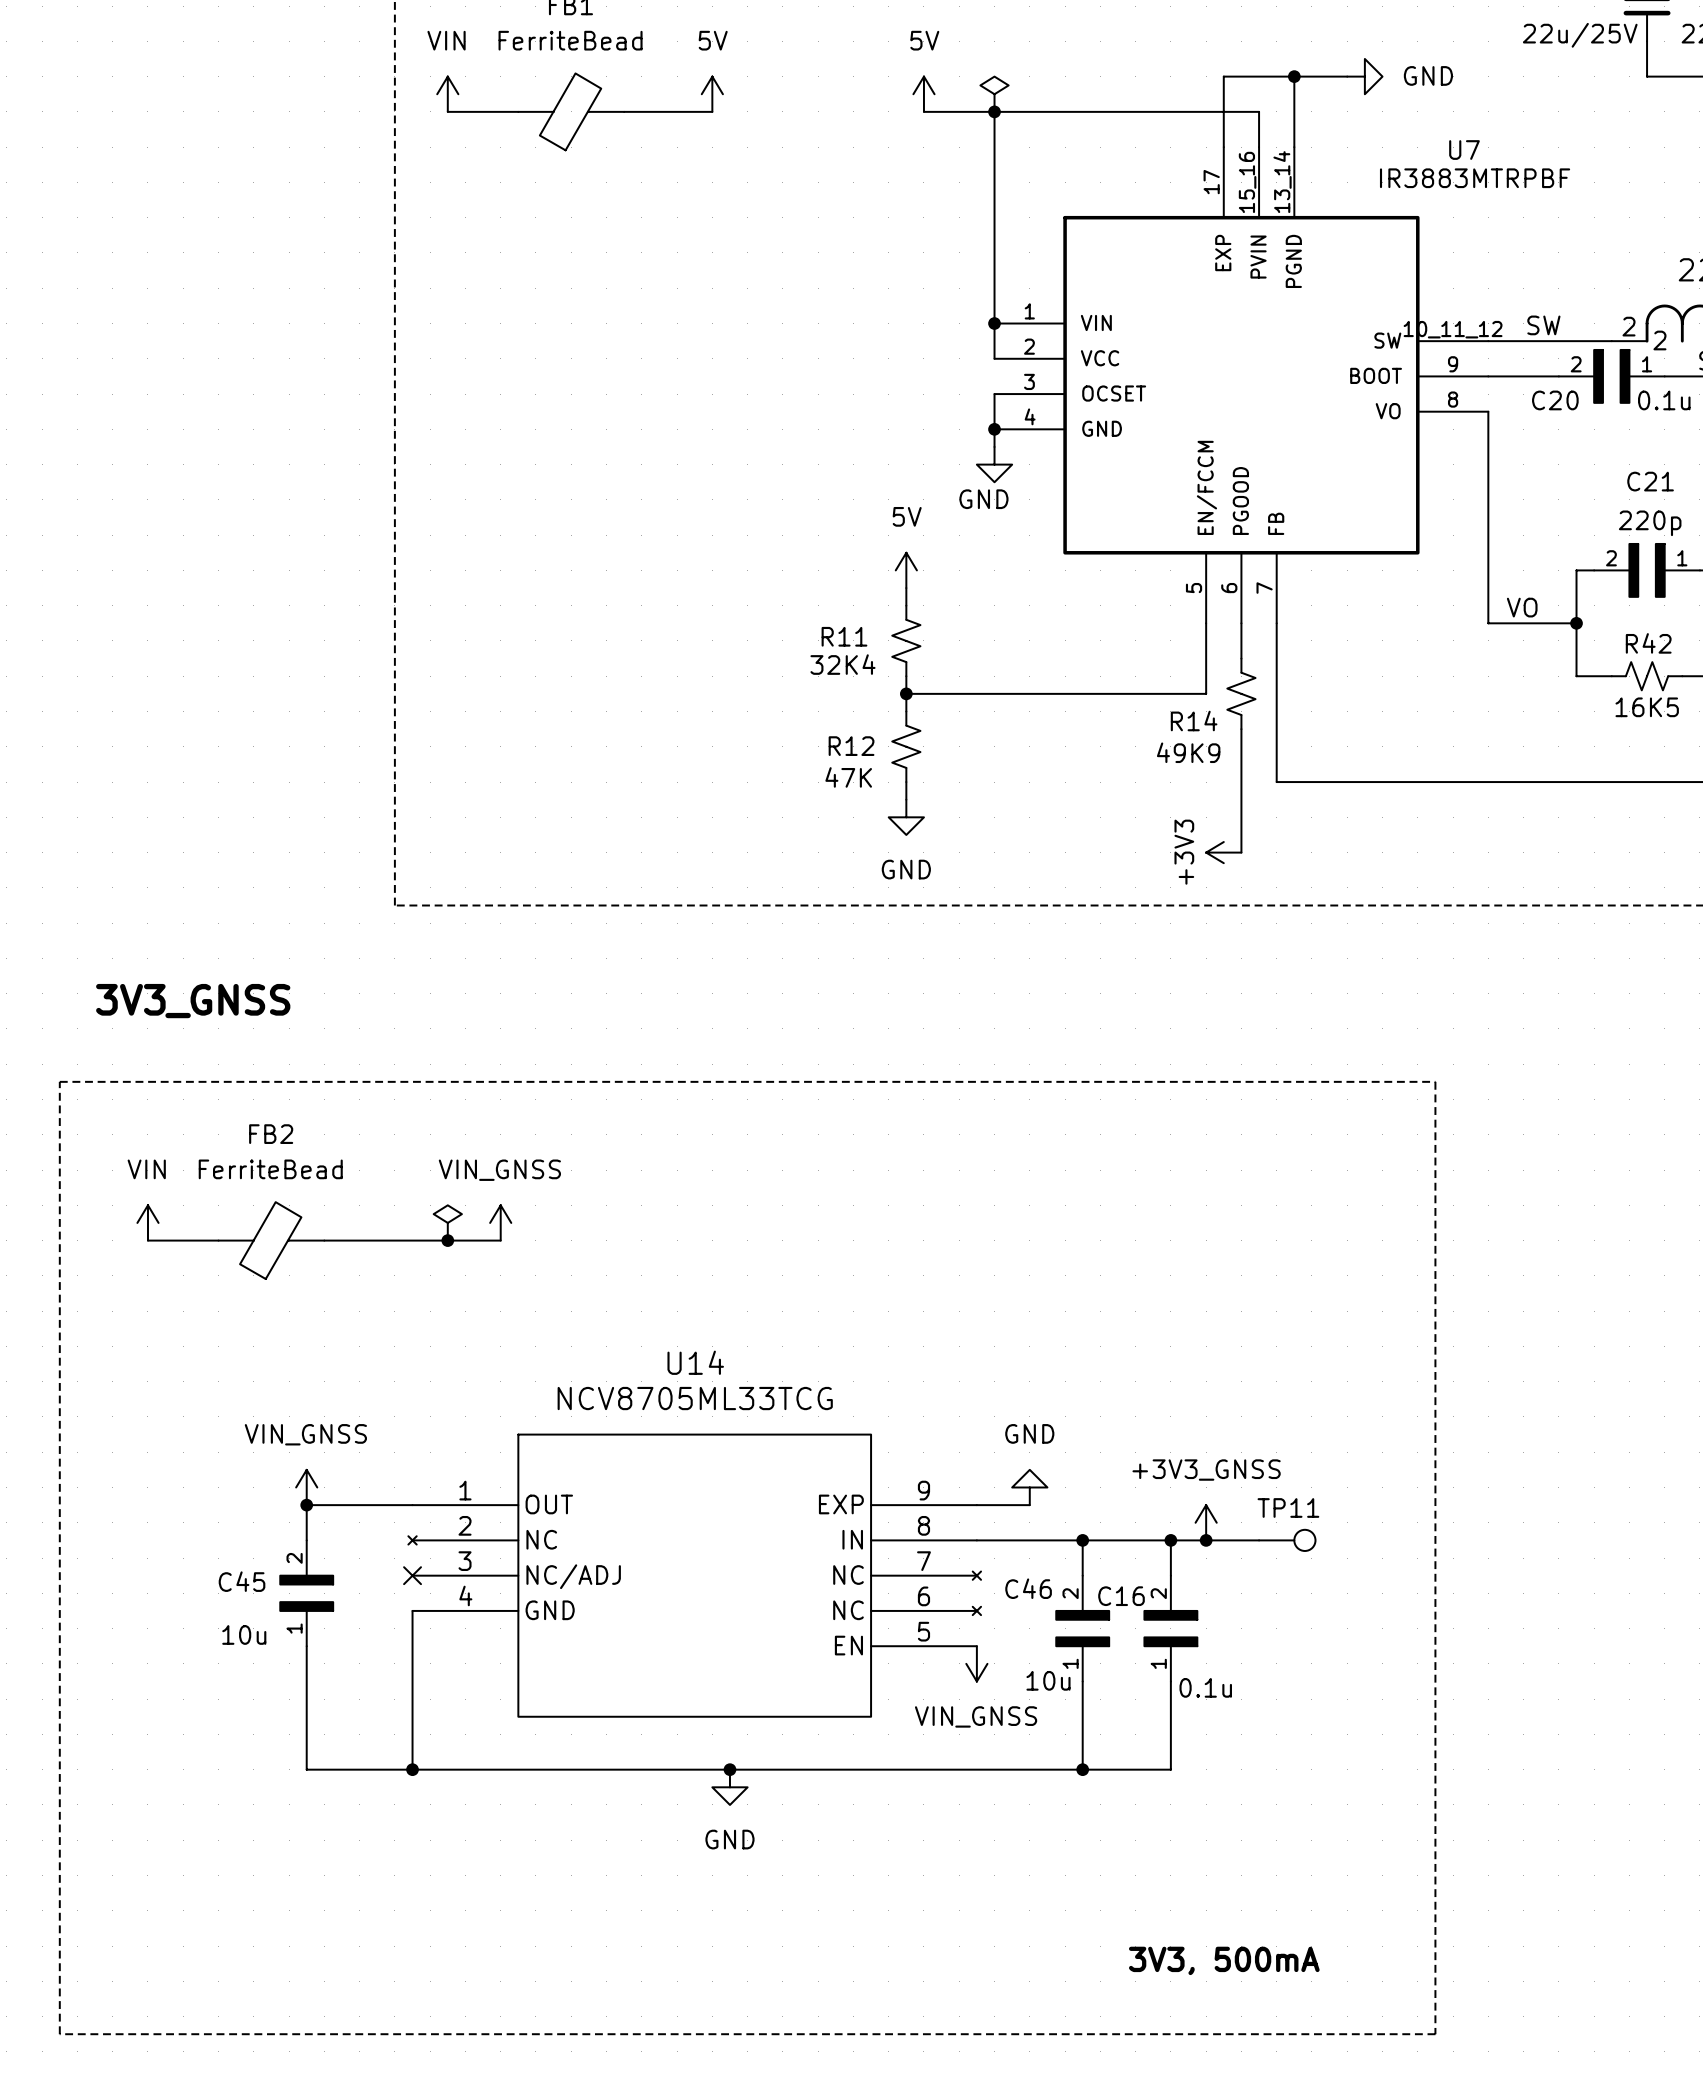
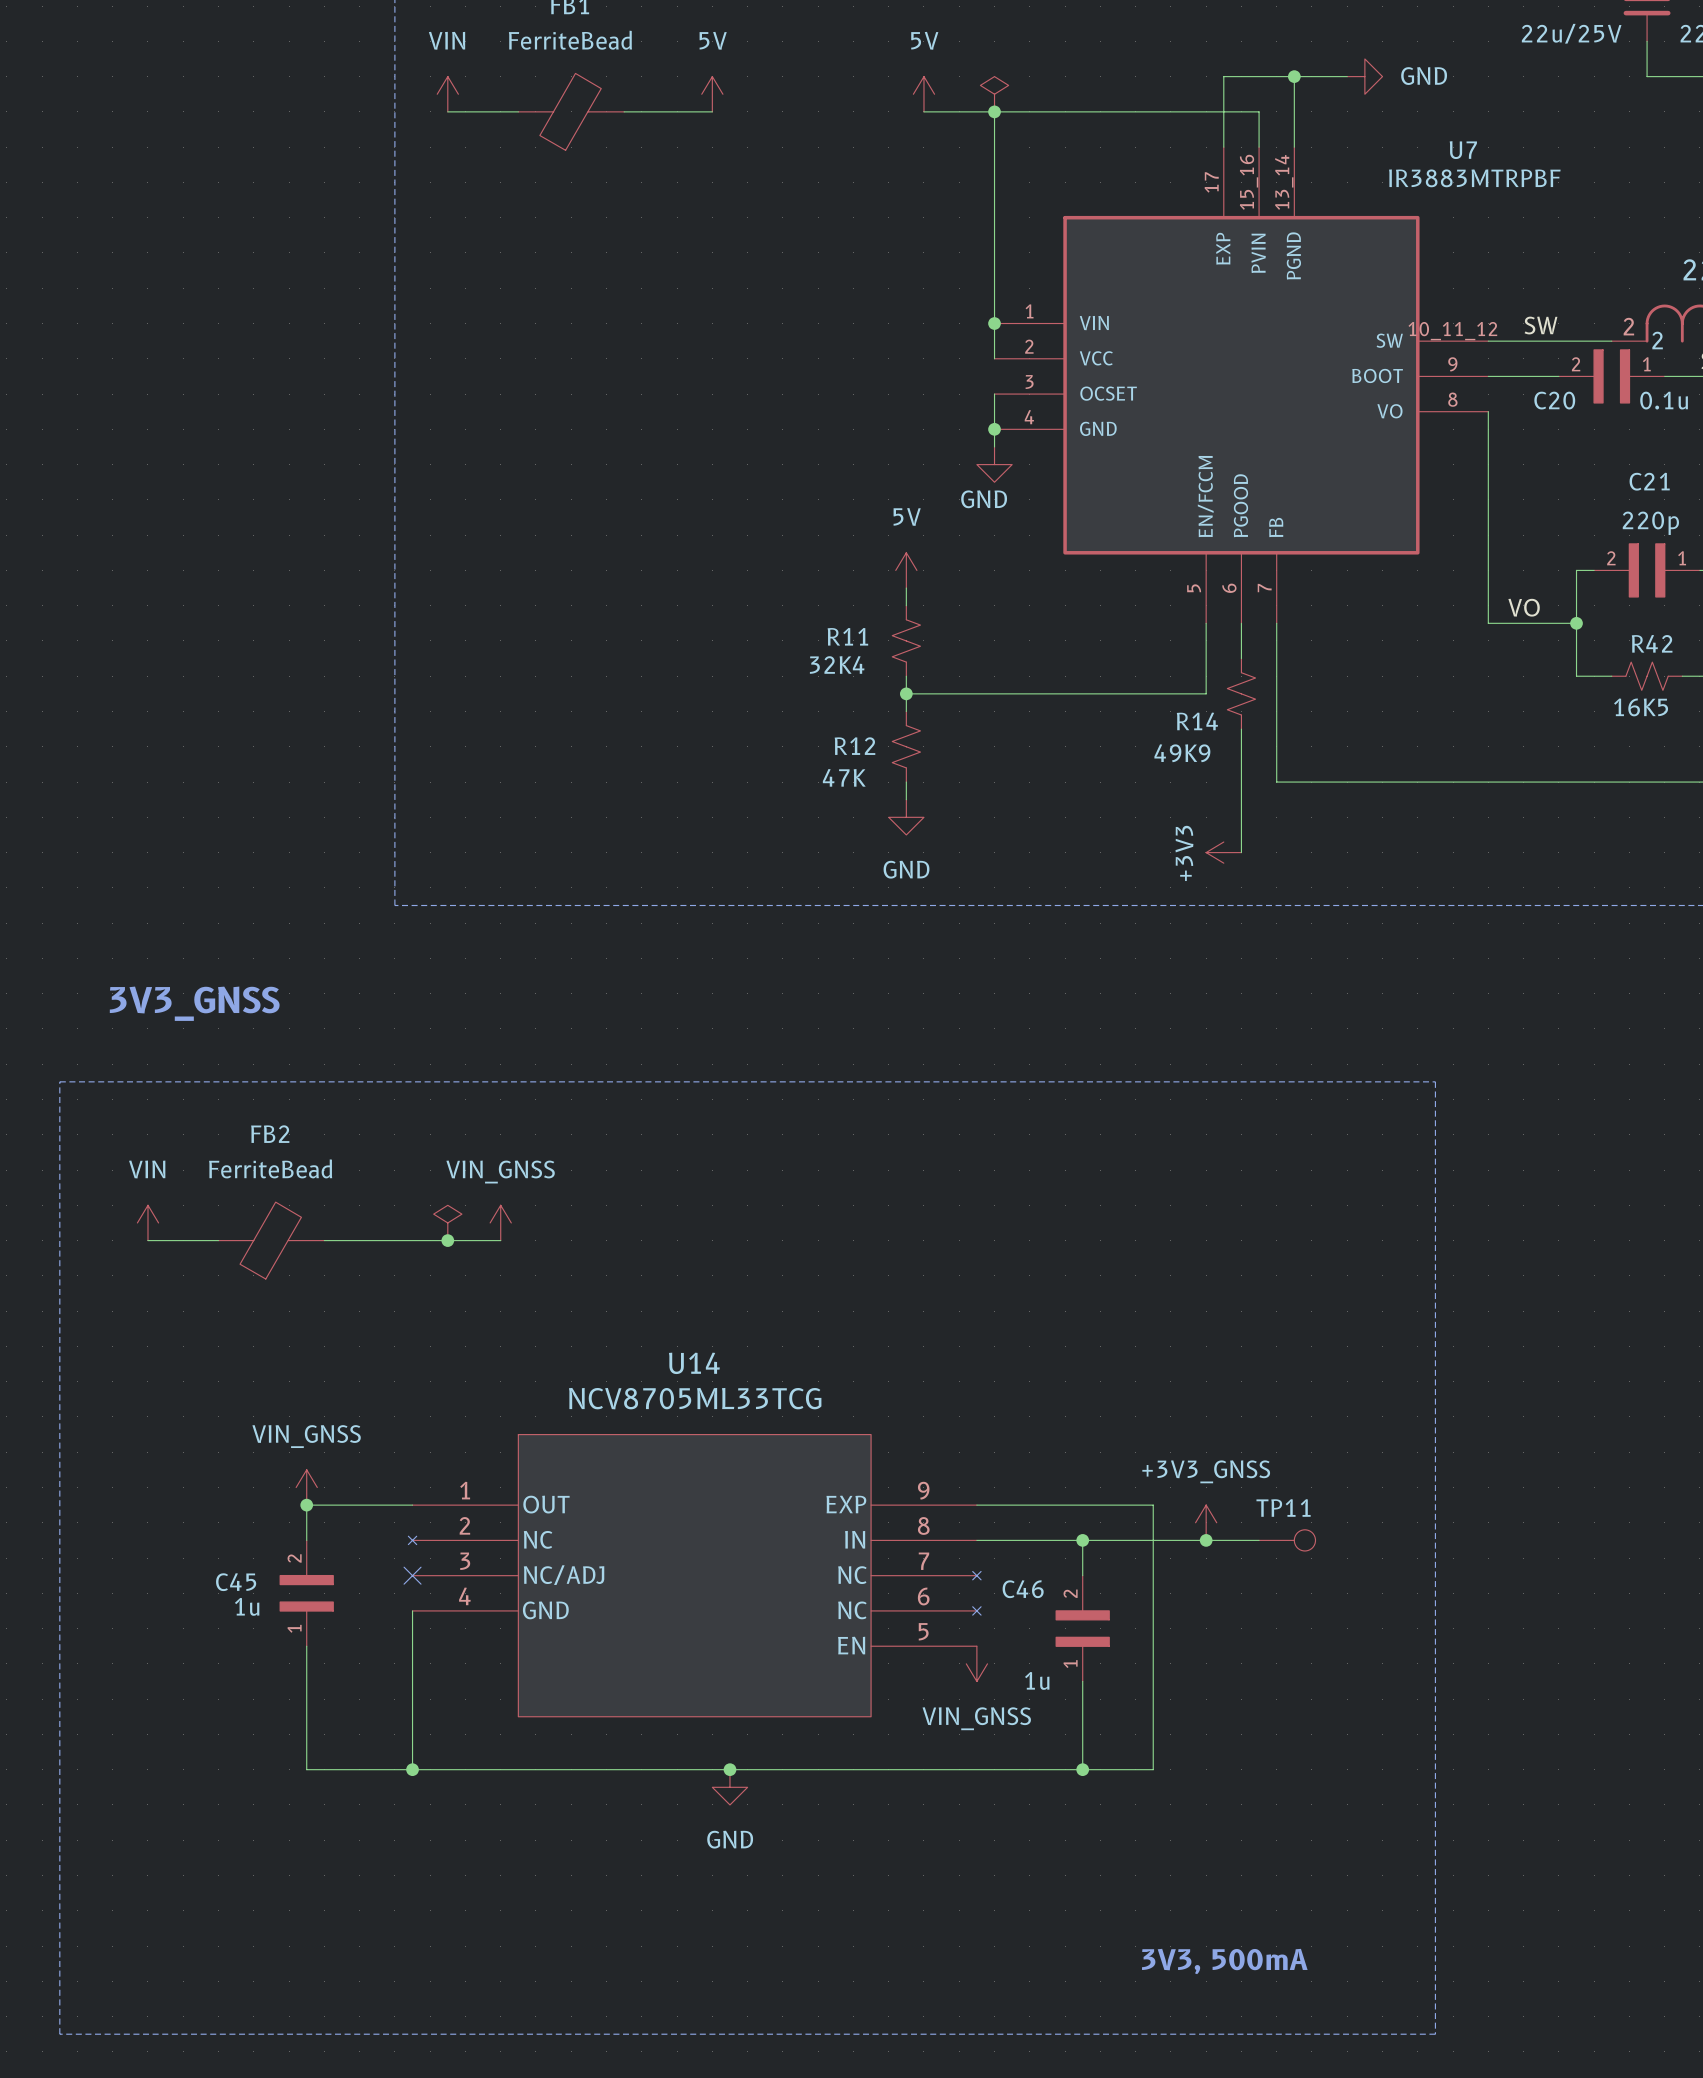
power symbol: GND (1029, 1487) -> none
wire: (1170, 1540) (1170, 1575) -> none
junction: (1170, 1540) -> none
C16: 0.1u (1170, 1628) -> none
C45 value: 10u (244, 1634) -> 1u (247, 1606)
C46 value: 10u (1048, 1680) -> 1u (1037, 1680)
wire: (1170, 1681) (1170, 1769) (1153, 1769) -> (1029, 1505) (1153, 1505) (1153, 1769)

